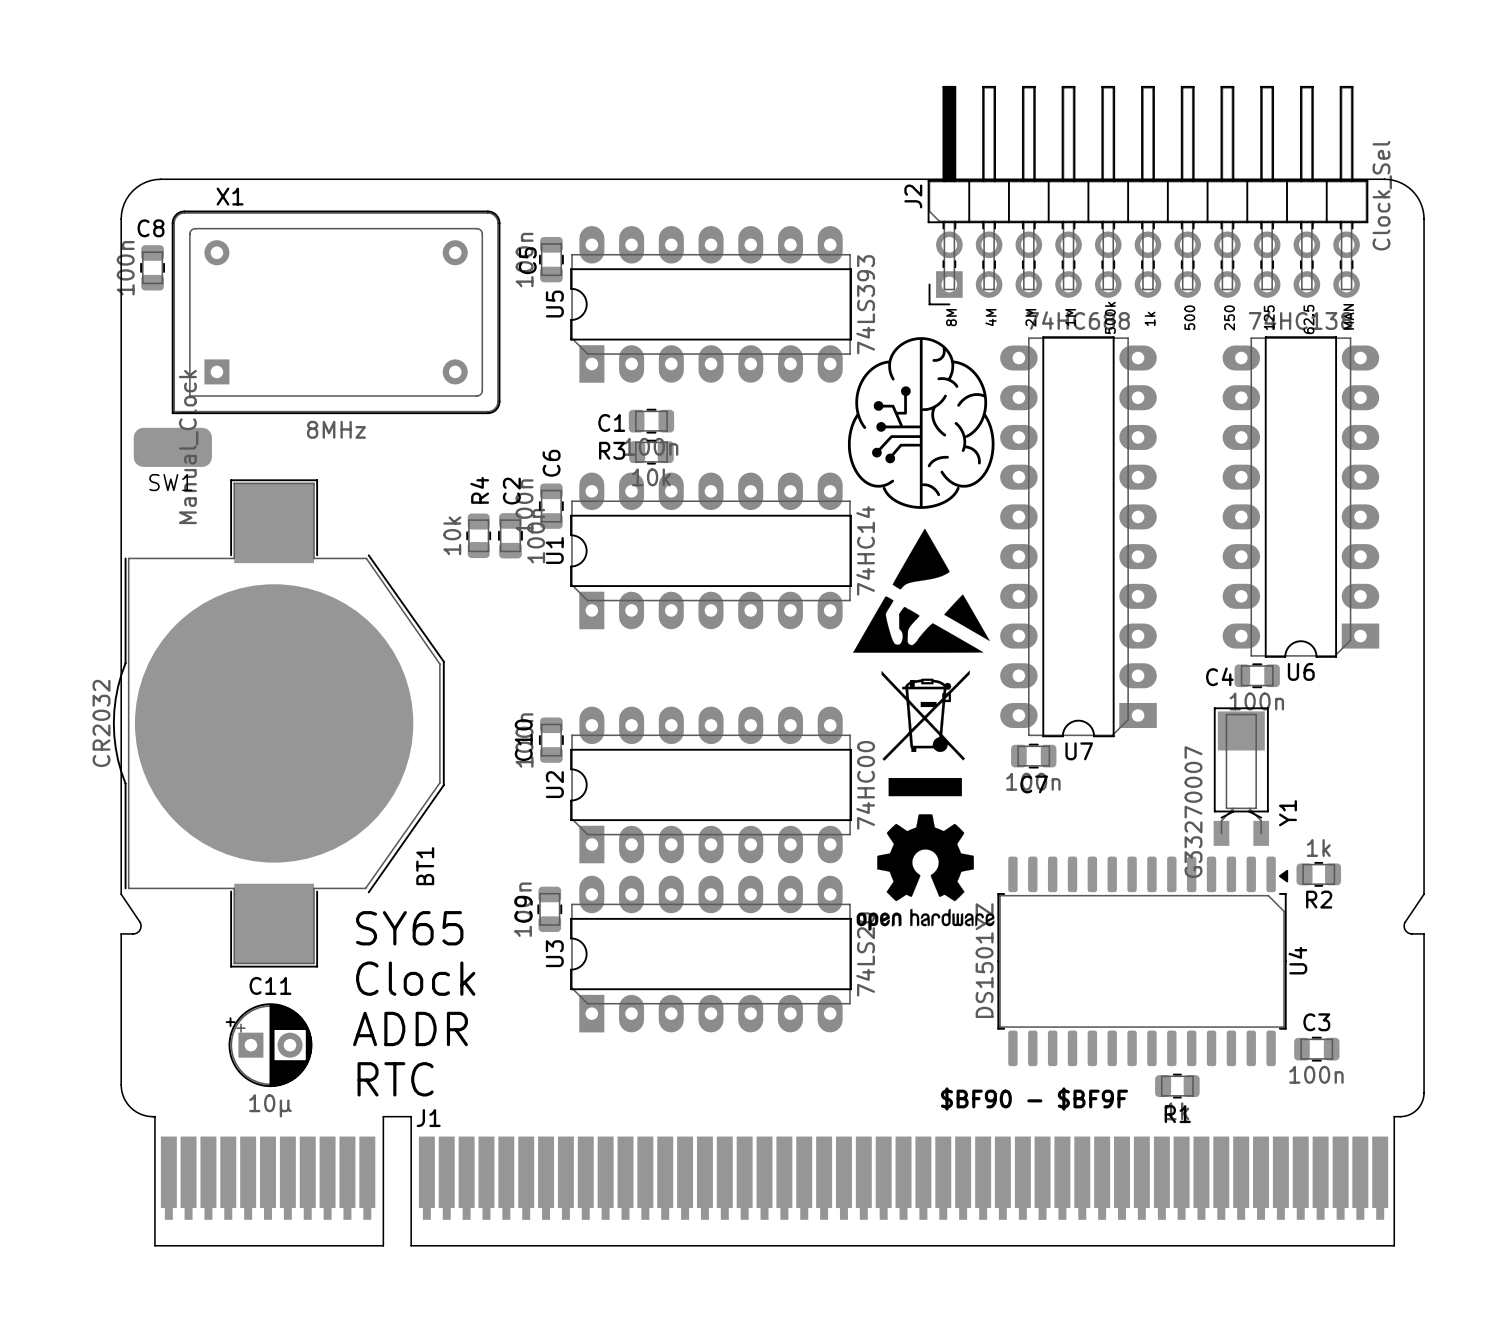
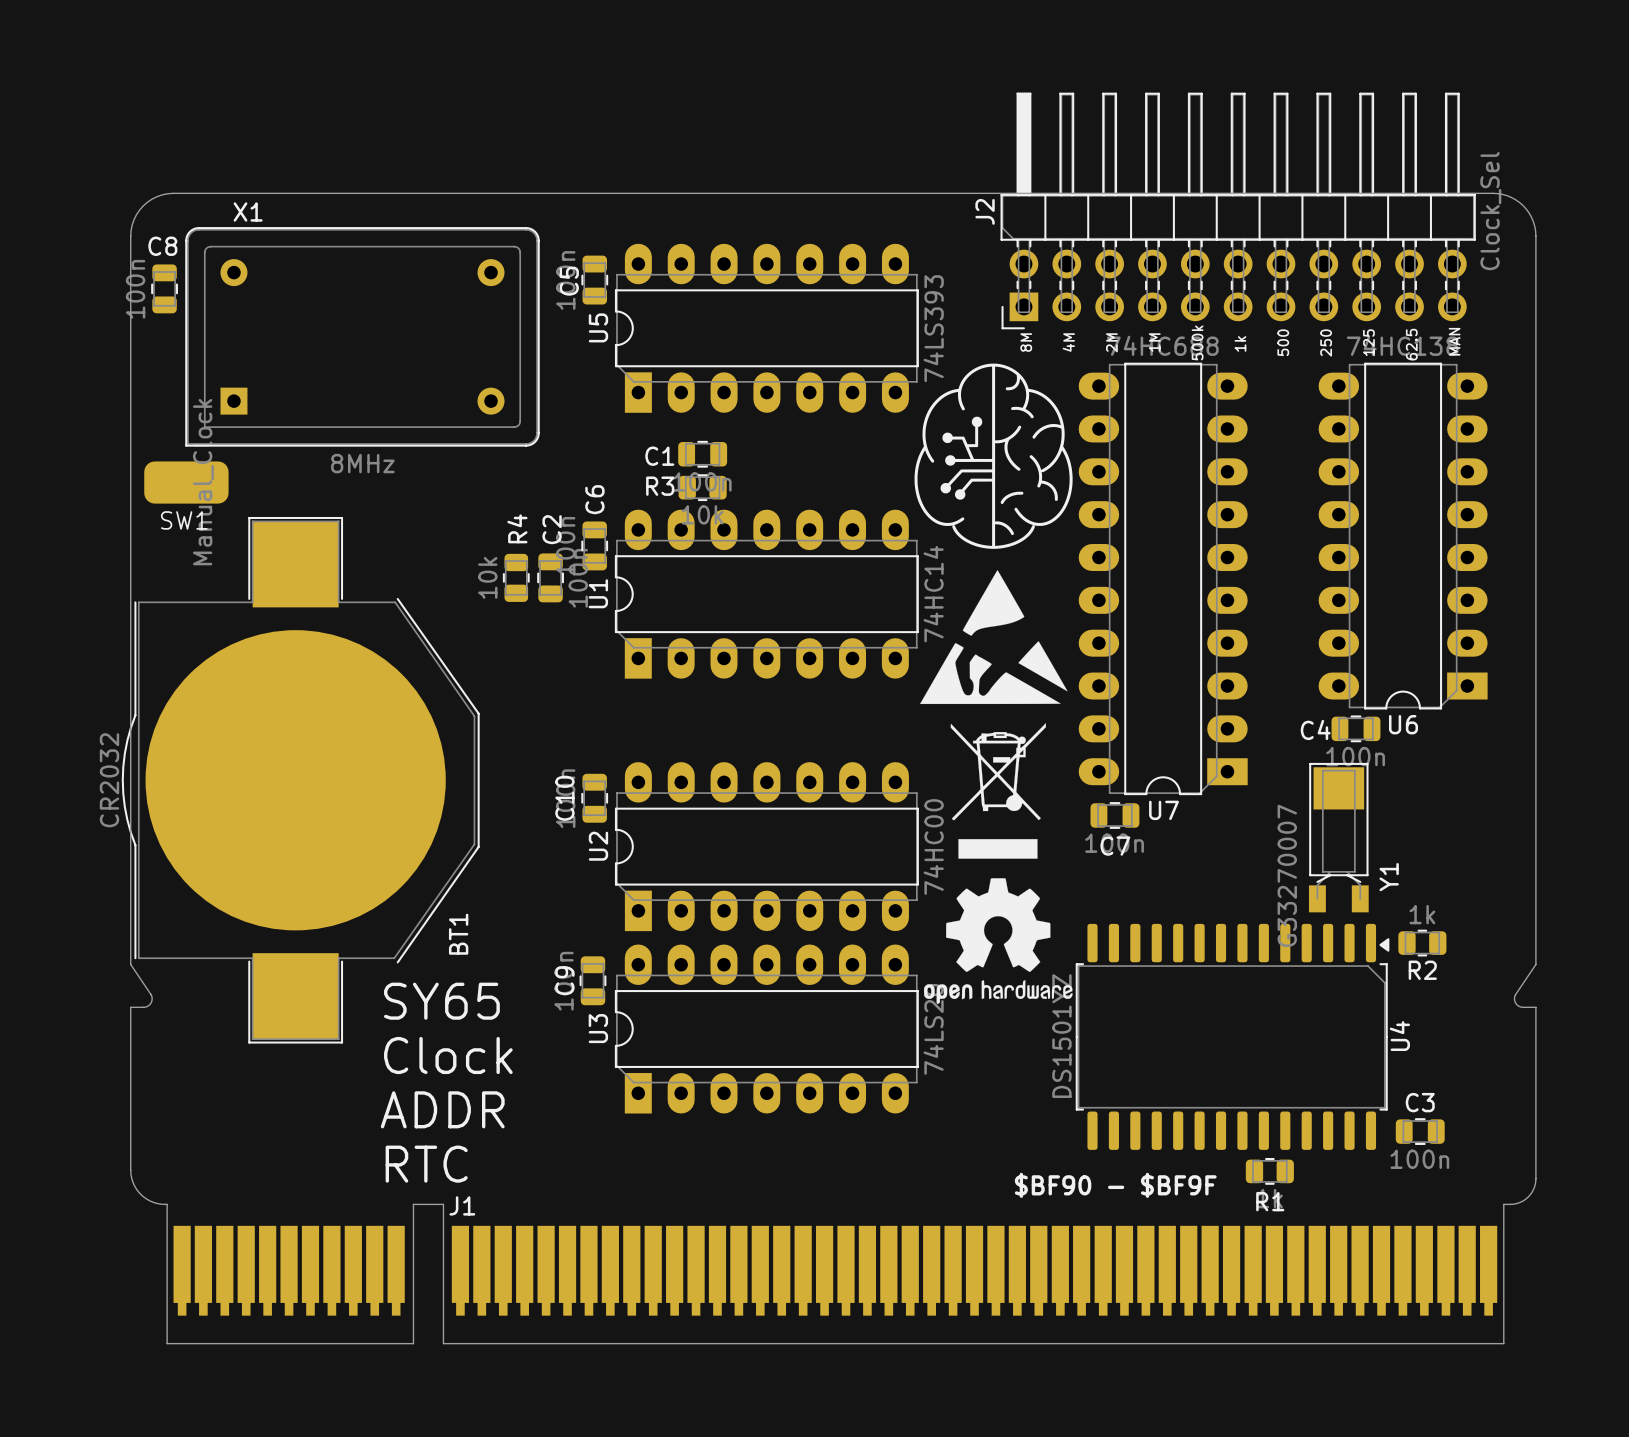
C11: 10µ (269, 1045) -> none

